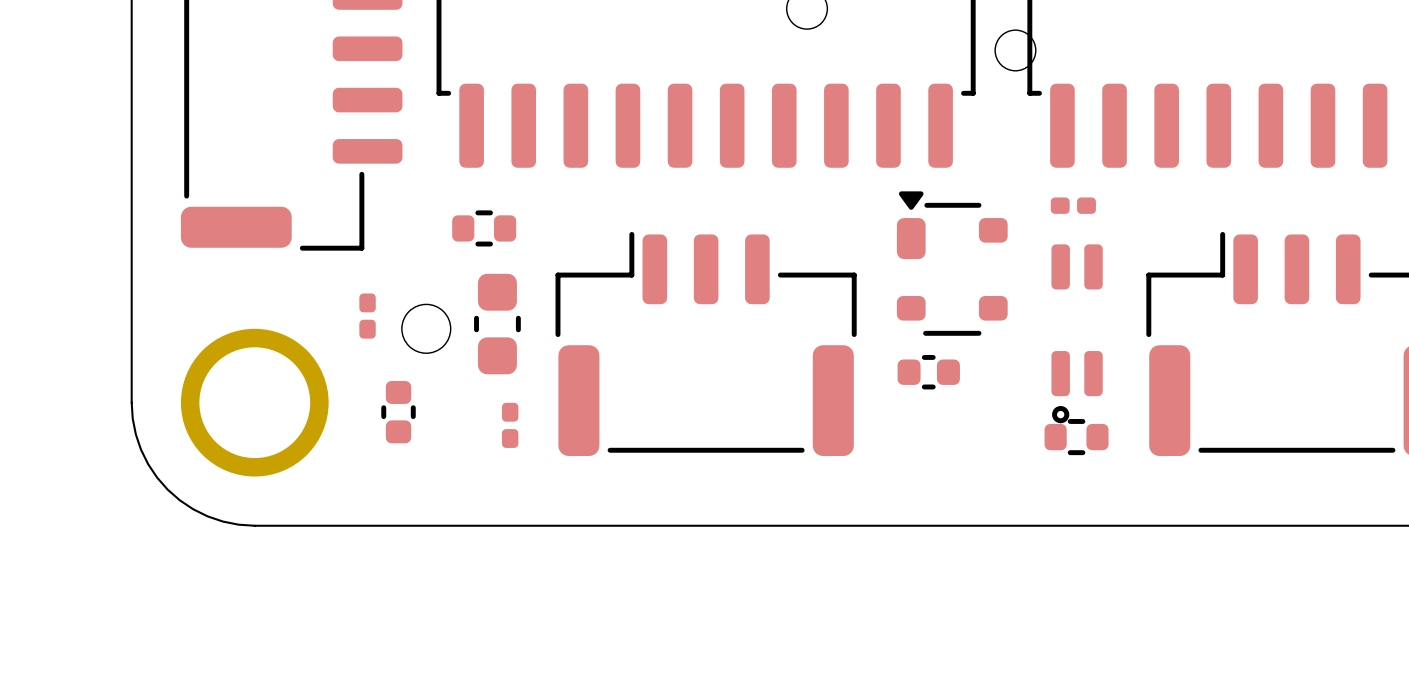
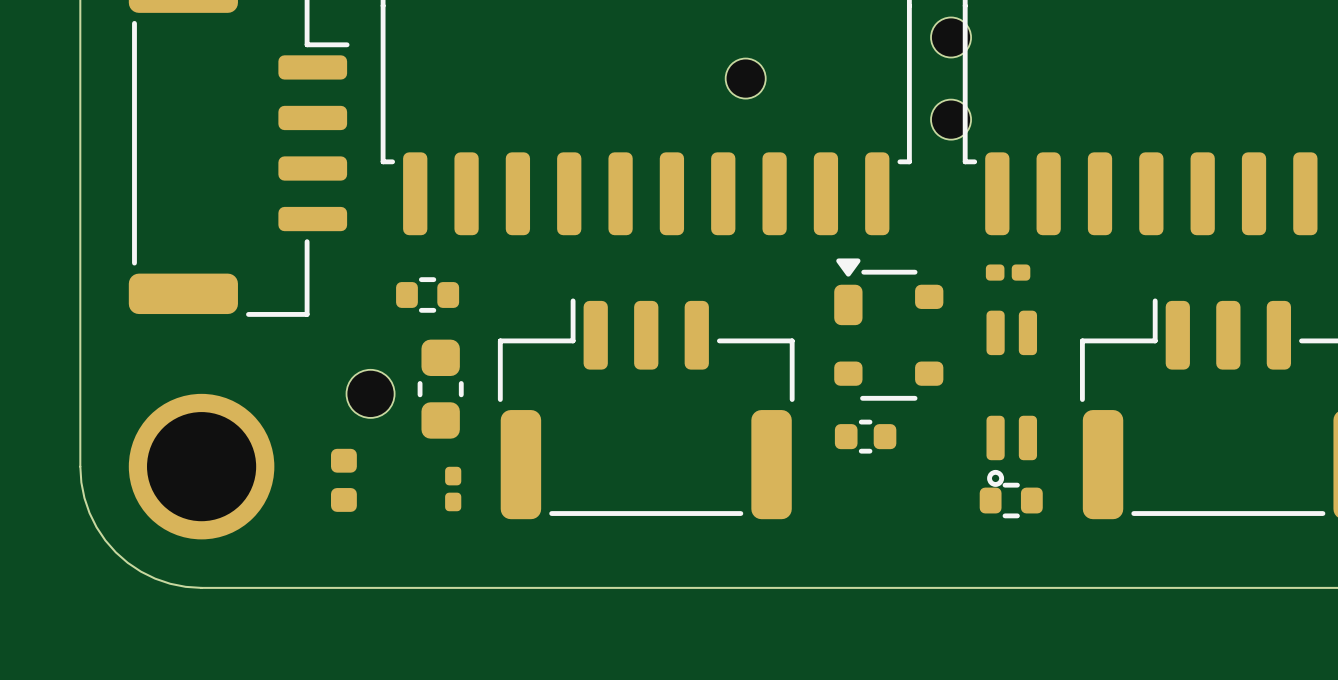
part: (367, 316) -> none
part footprint: [381, 380, 416, 444] -> [331, 448, 357, 512]

